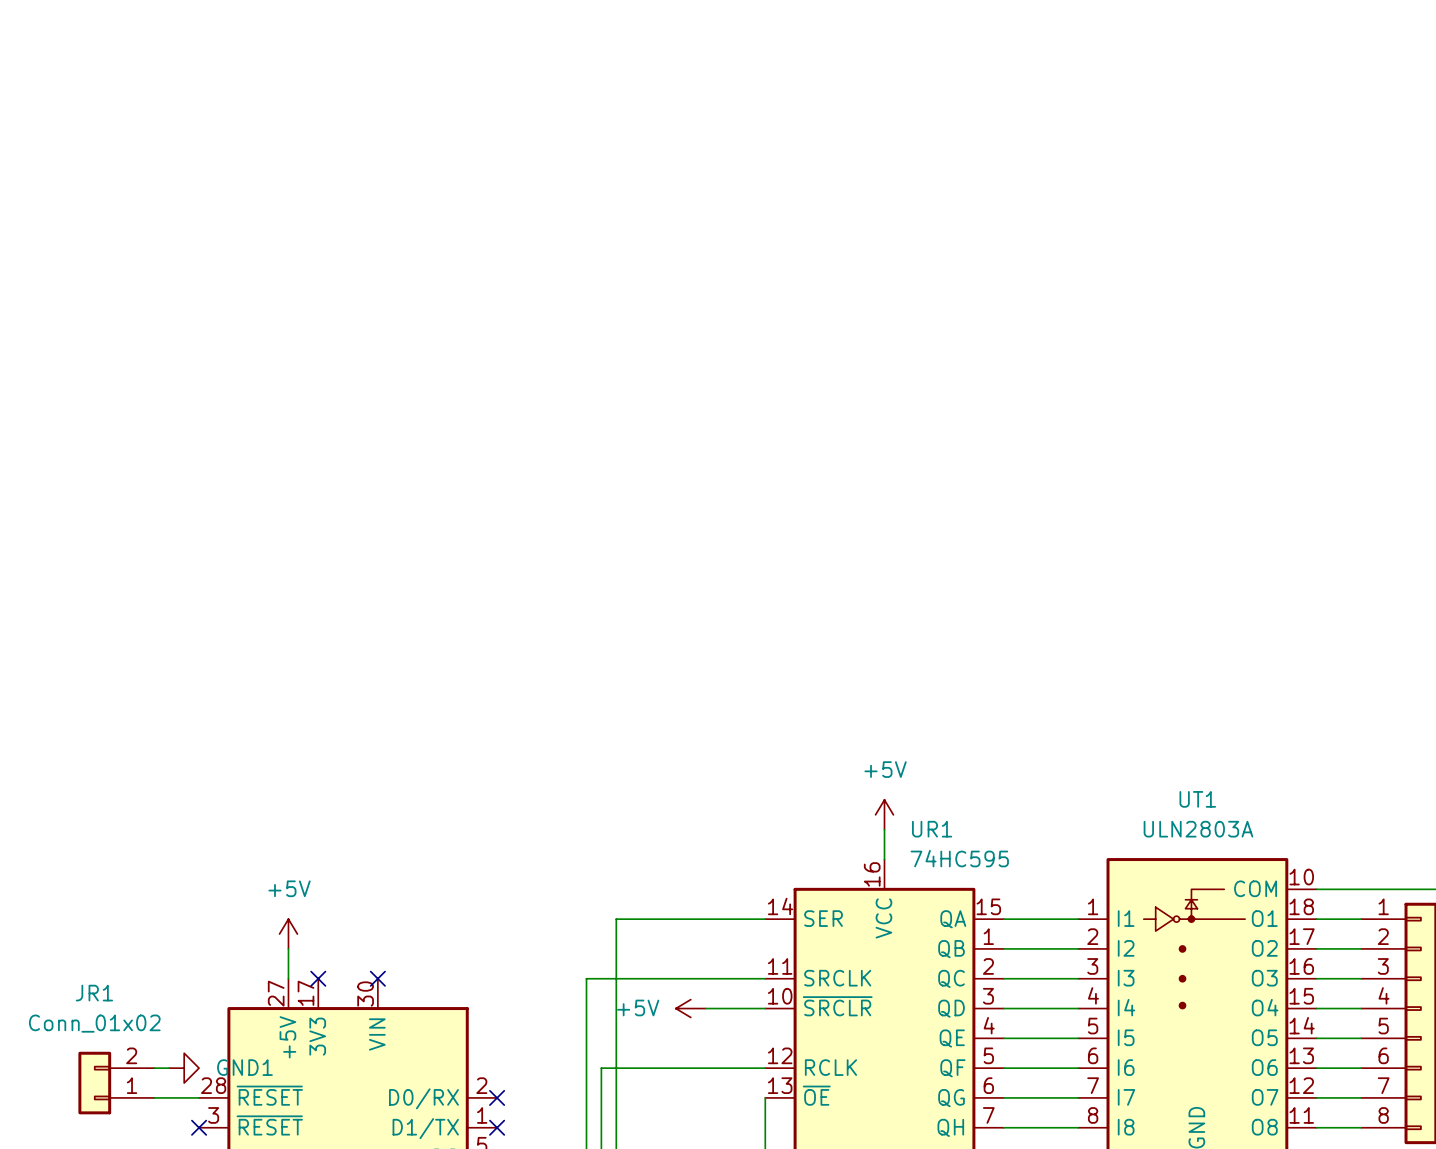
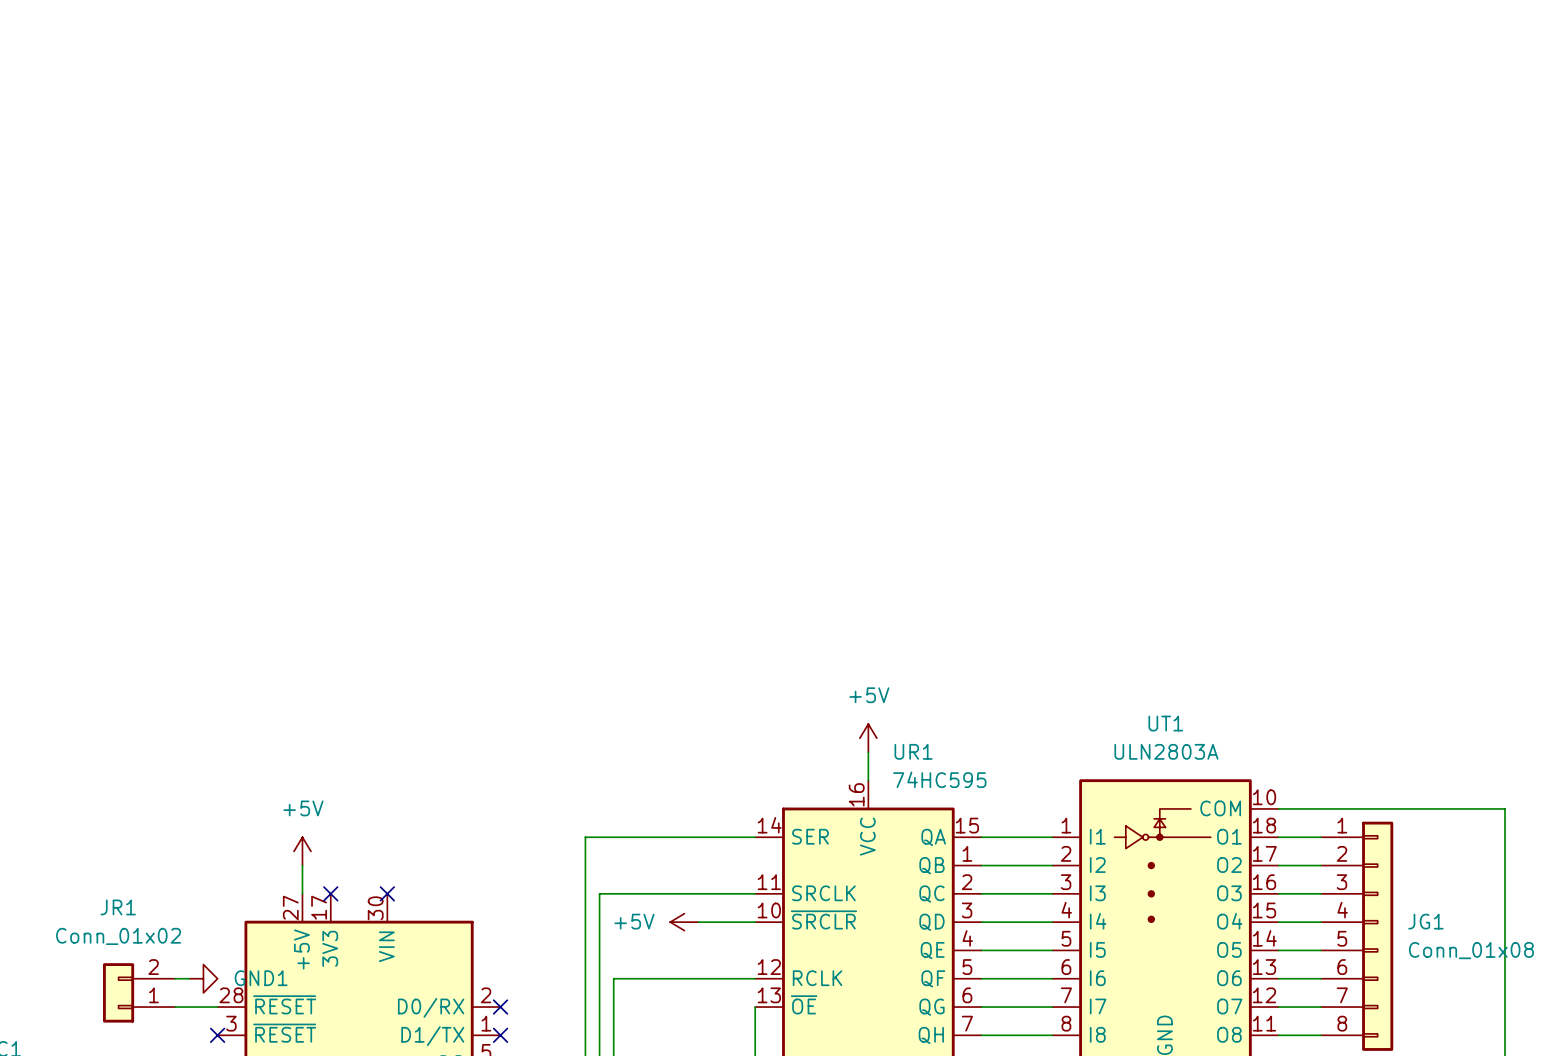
wire: (616, 919) (616, 1068) (601, 1068) -> (599, 893) (599, 978)
wire: (586, 978) (601, 978) -> (585, 893) (585, 837) (613, 837)

